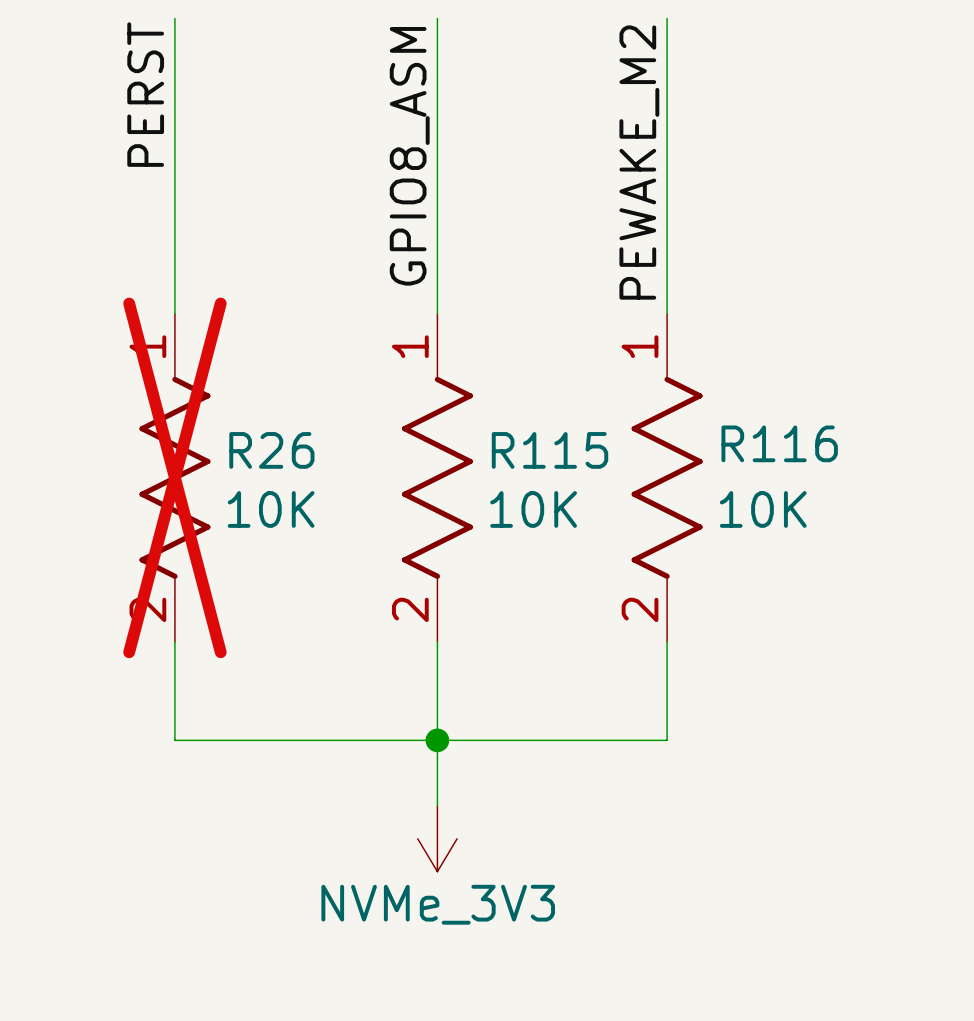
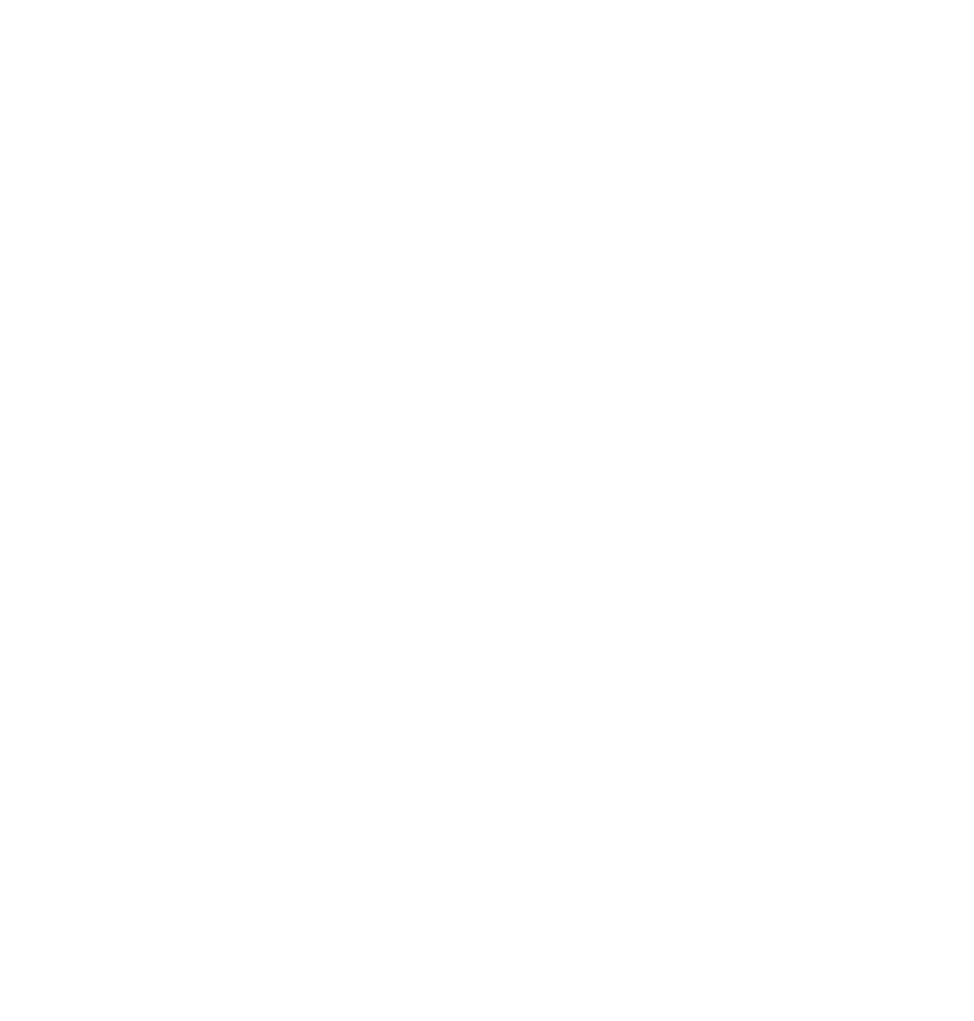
wire: (174, 18) (174, 313) -> none
wire: (437, 18) (437, 313) -> none
wire: (667, 18) (667, 313) -> none
label: PERST (145, 94) -> none
label: GPIO8_ASM (409, 156) -> none
label: PEWAKE_M2 (639, 162) -> none
R26: 10K (174, 477) -> none
R115: 10K (437, 477) -> none
R116: 10K (667, 477) -> none
wire: (174, 641) (174, 740) (667, 740) (667, 641) -> none
wire: (437, 641) (437, 805) -> none
junction: (437, 740) -> none
power symbol: NVMe_3V3 (437, 838) -> none

